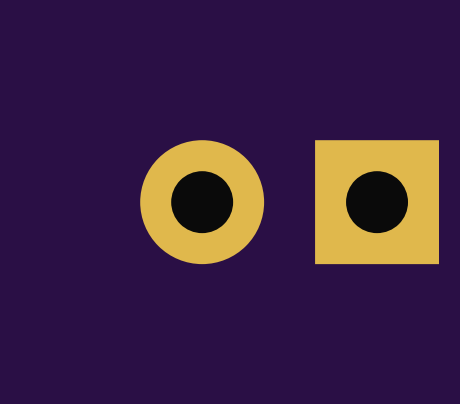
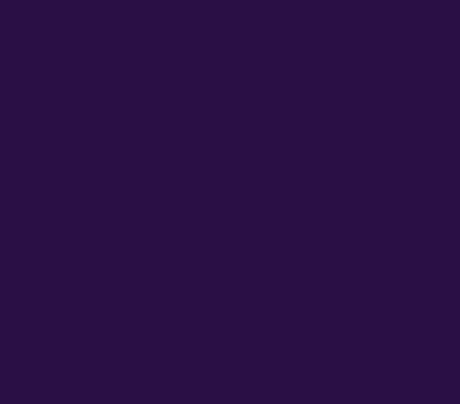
part: (289, 202) -> none

